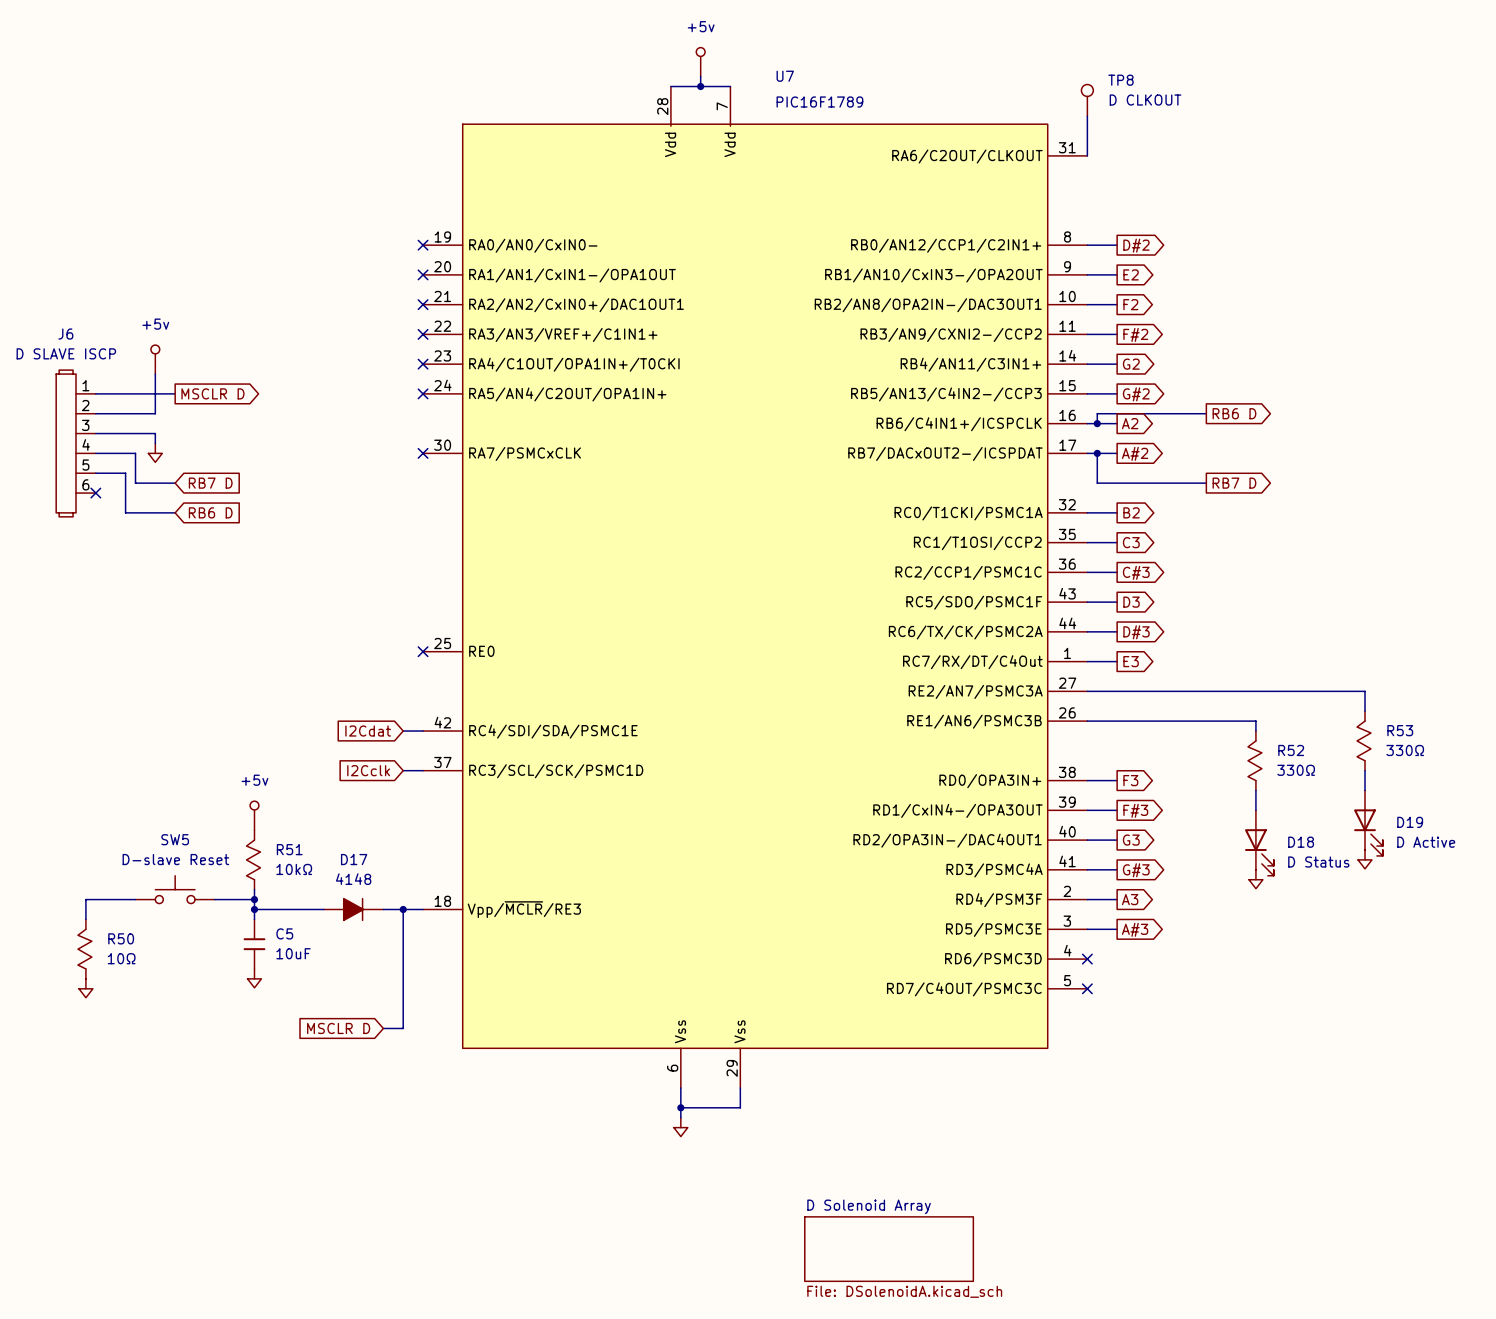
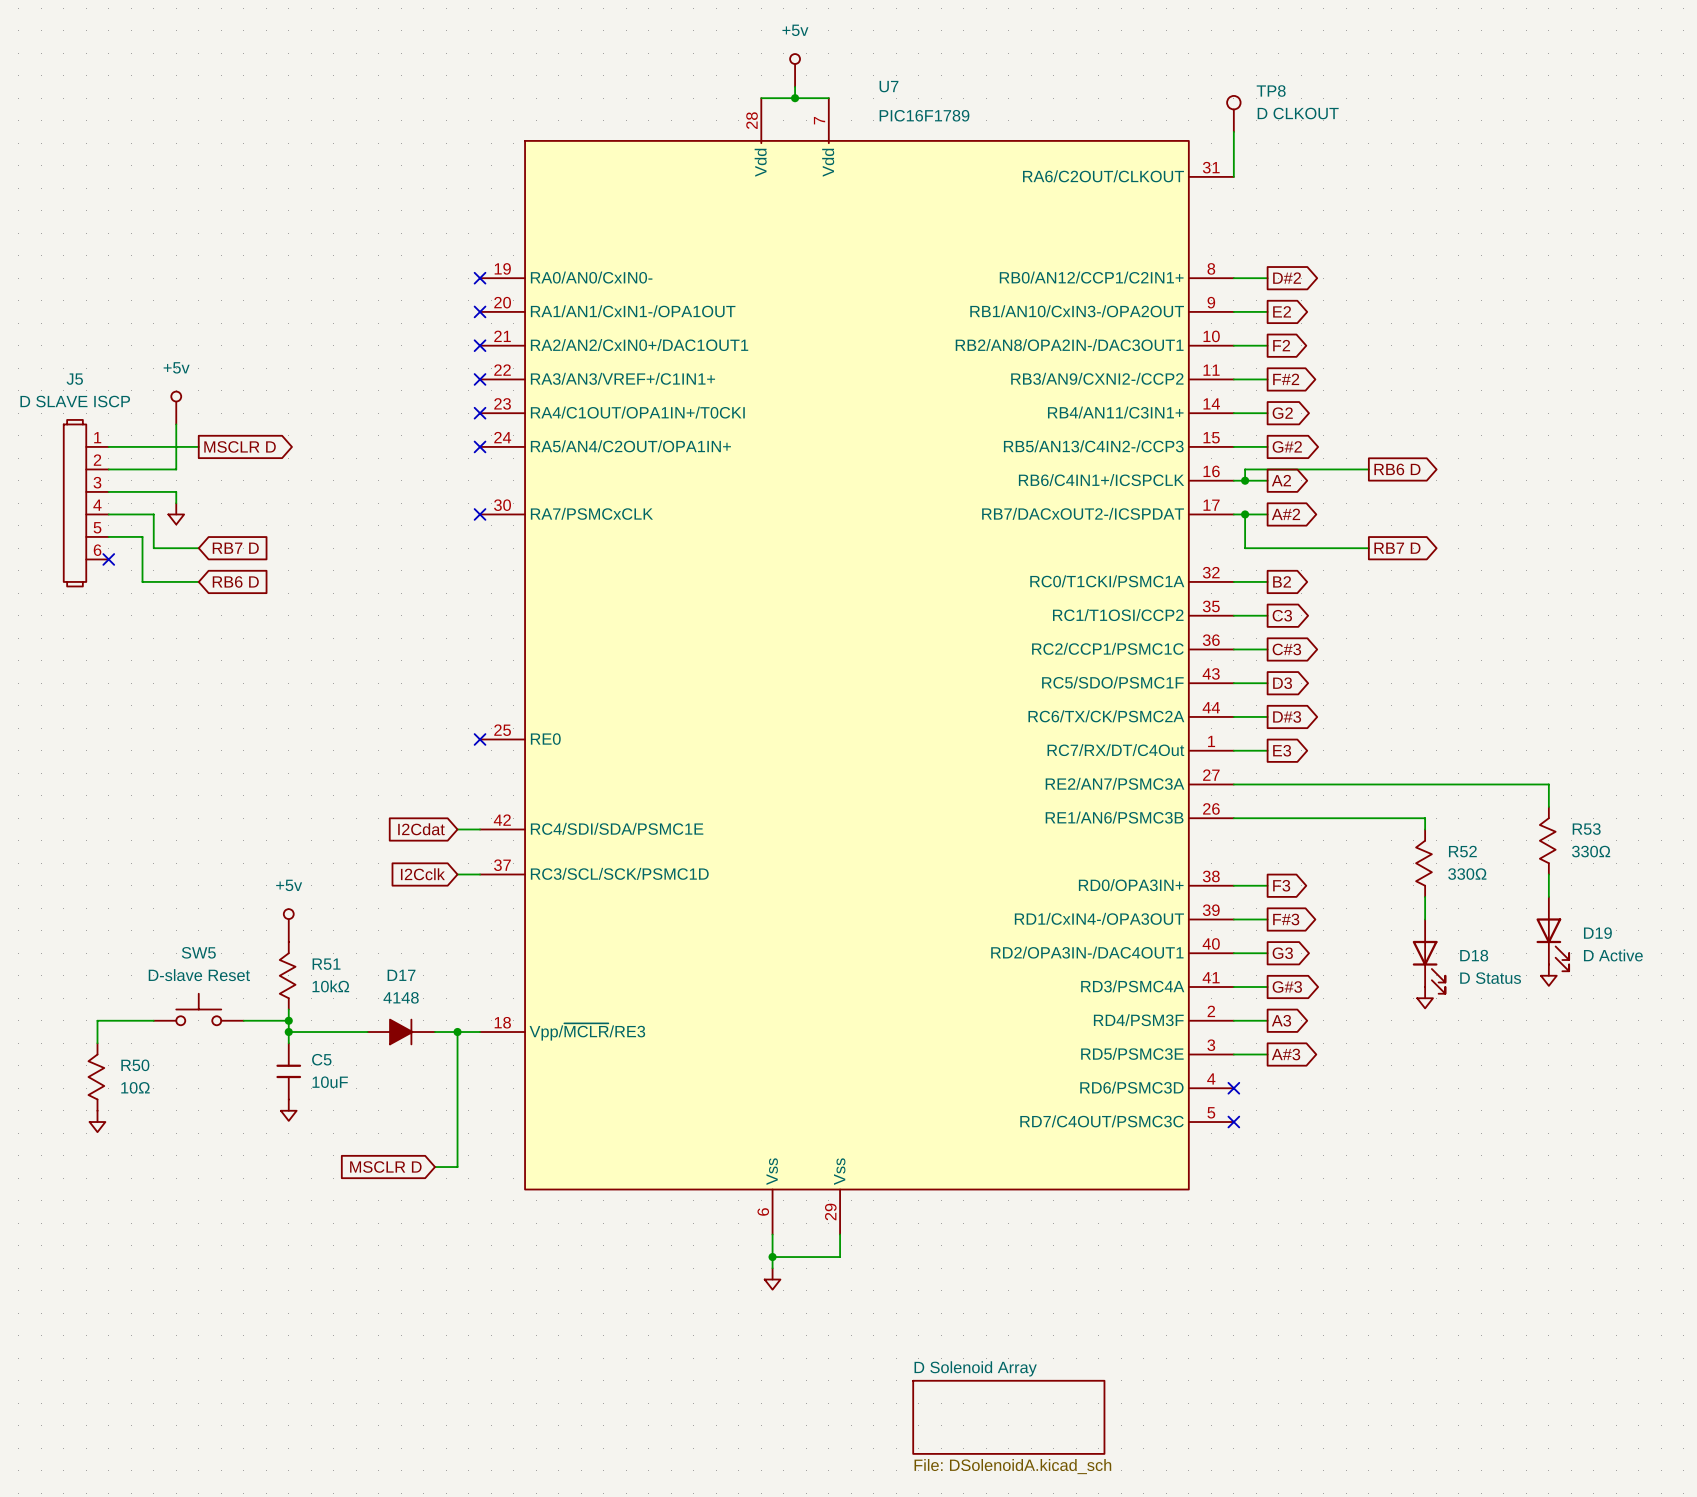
J6 name: J6 (65, 334) -> J5 (74, 379)

